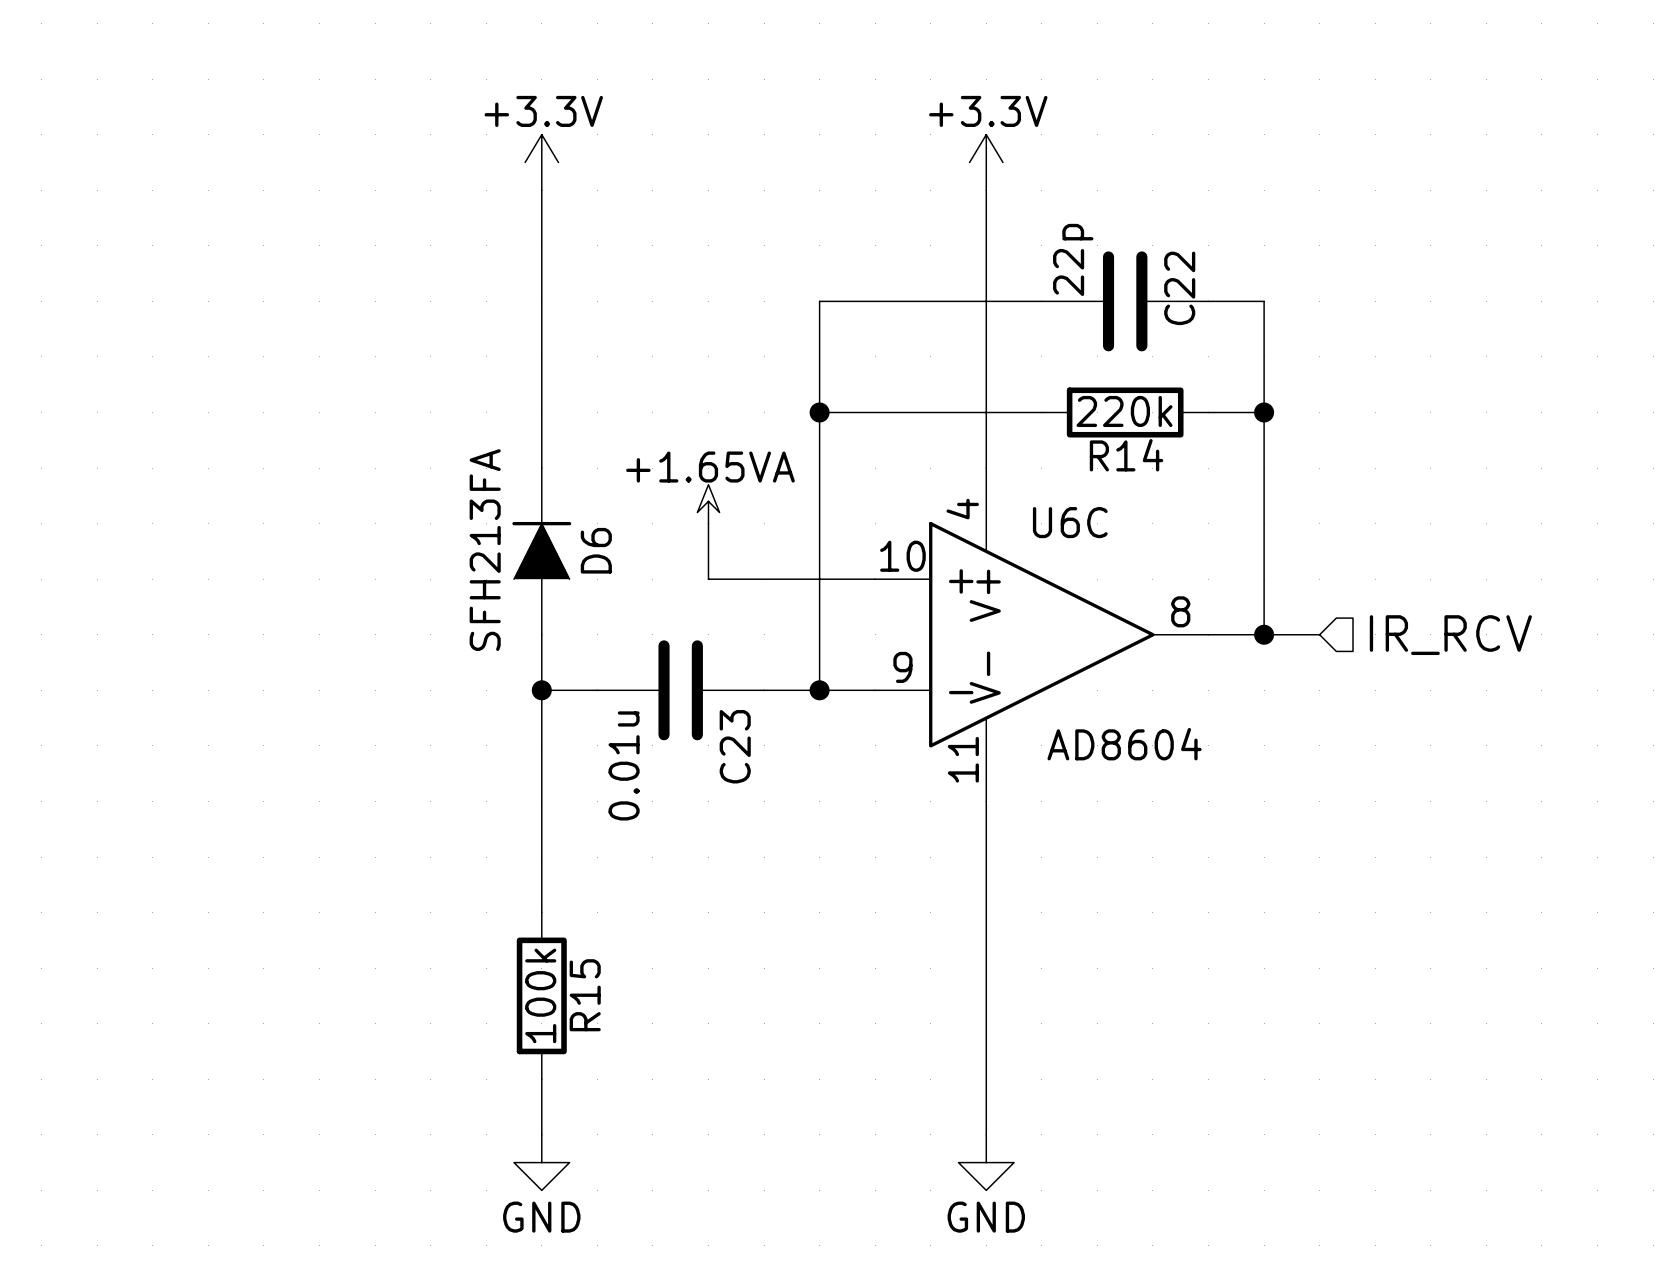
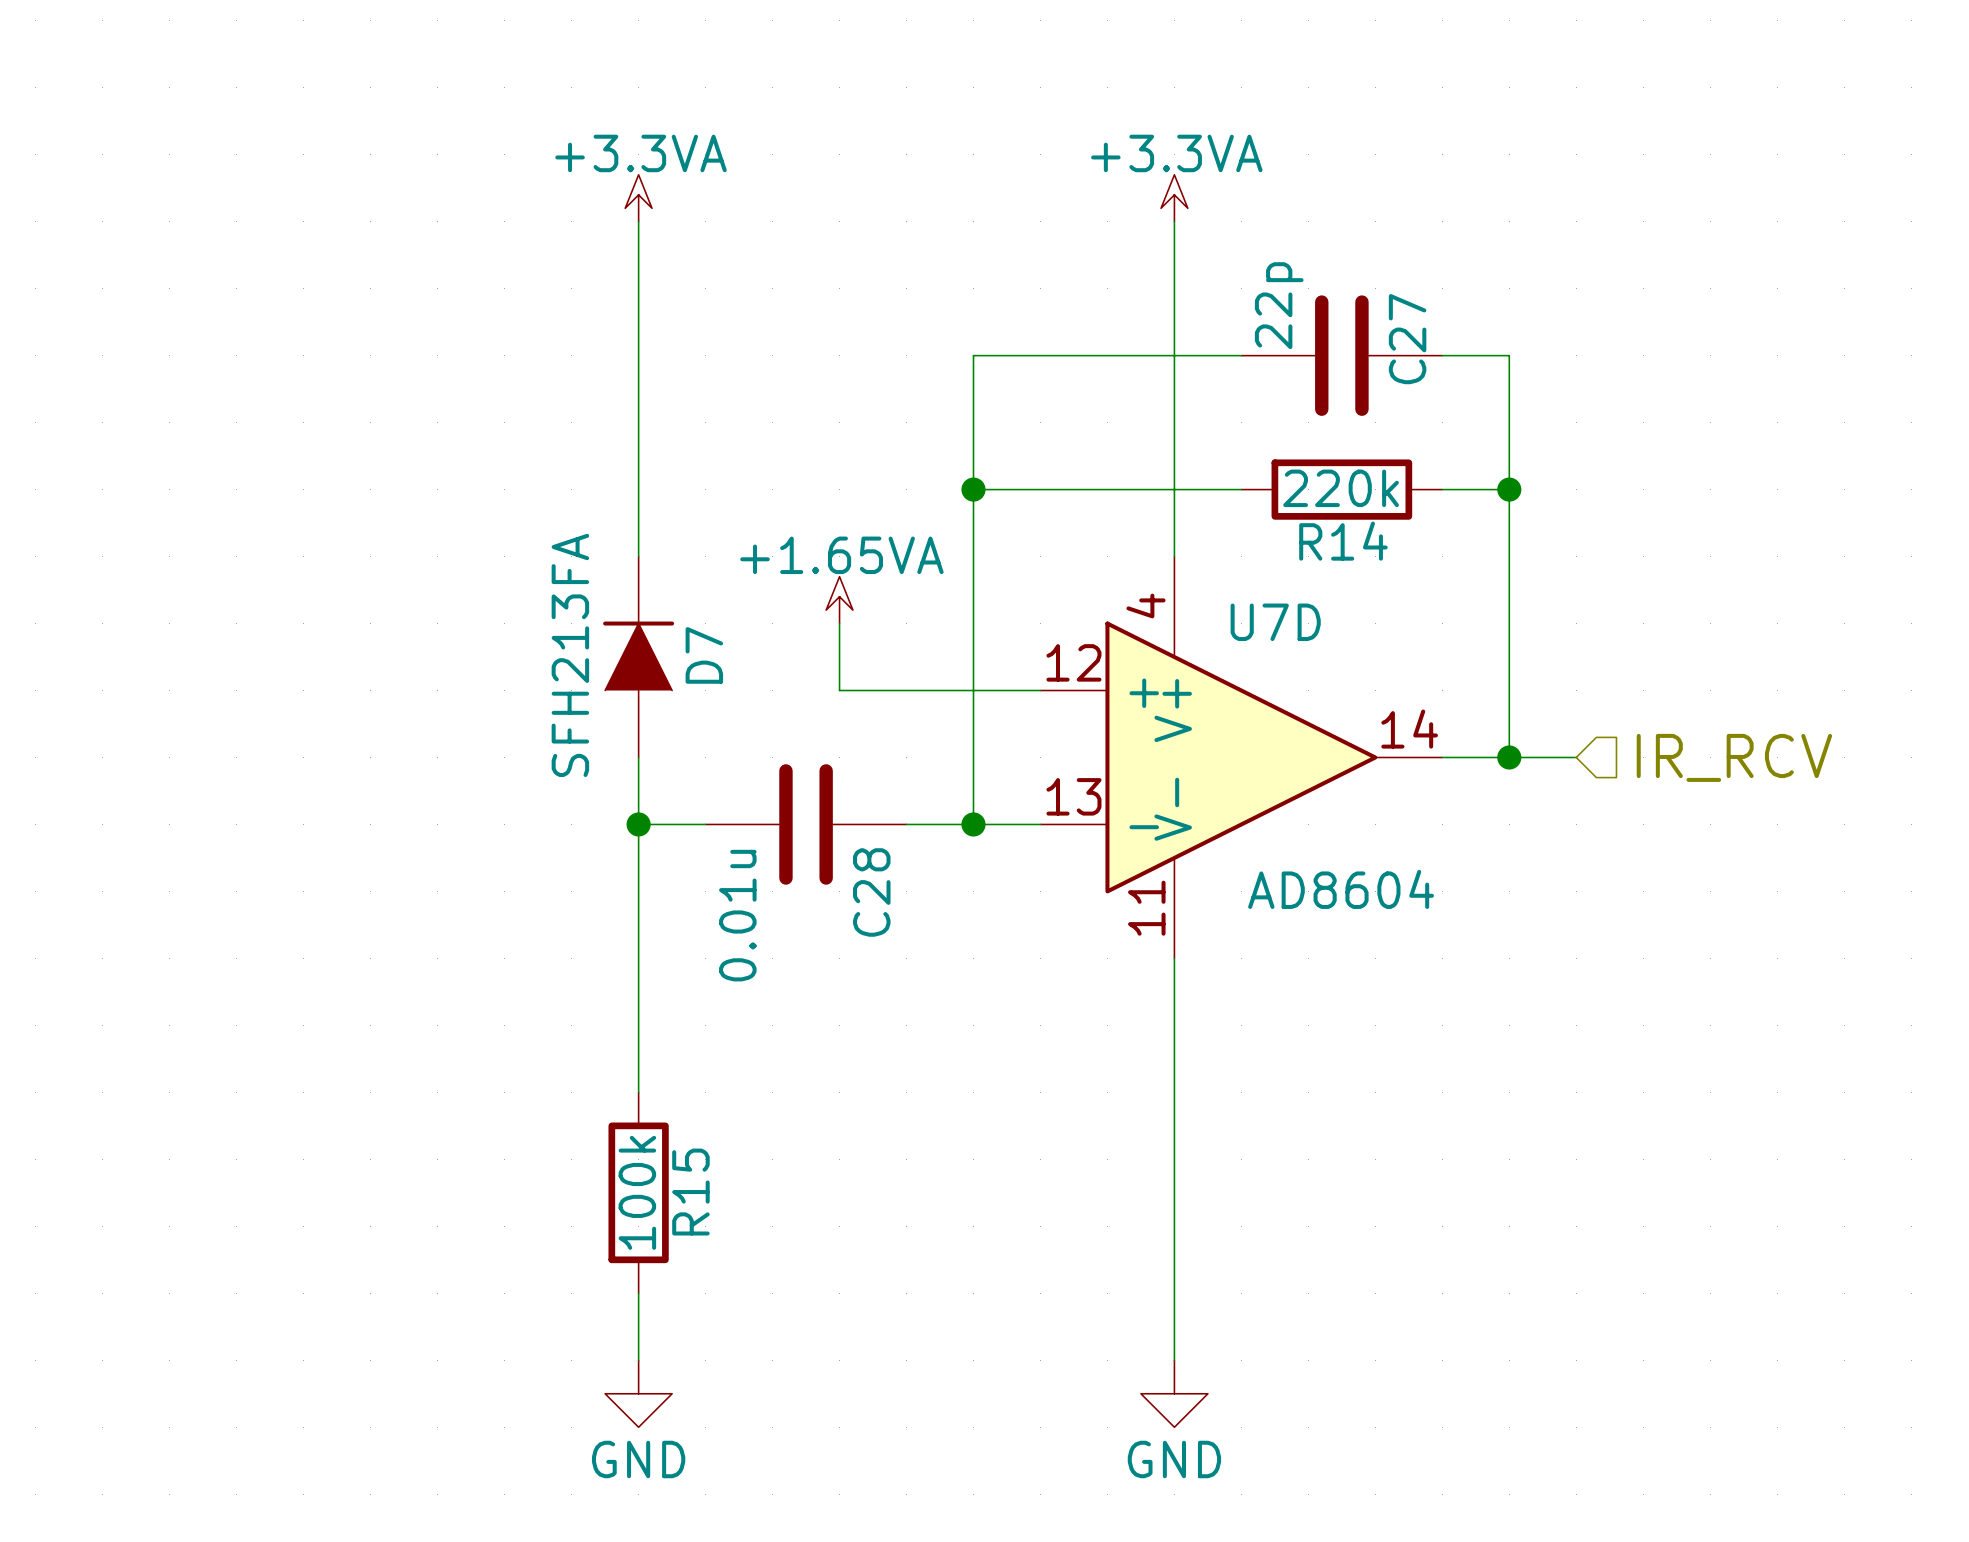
power symbol: +3.3V (541, 162) -> +3.3VA (638, 198)
power symbol: +3.3V (986, 162) -> +3.3VA (1174, 198)
C22 name: C22 (1179, 288) -> C27 (1407, 339)
U6C name: U6C (1070, 522) -> U7D (1275, 622)
D6 name: D6 (596, 550) -> D7 (704, 655)
U6C pin number: 10 (902, 556) -> 12 (1073, 662)
U6C pin number: 8 (1180, 611) -> 14 (1409, 729)
U6C pin number: 9 (902, 667) -> 13 (1073, 796)
C23 name: C23 (735, 746) -> C28 (871, 892)

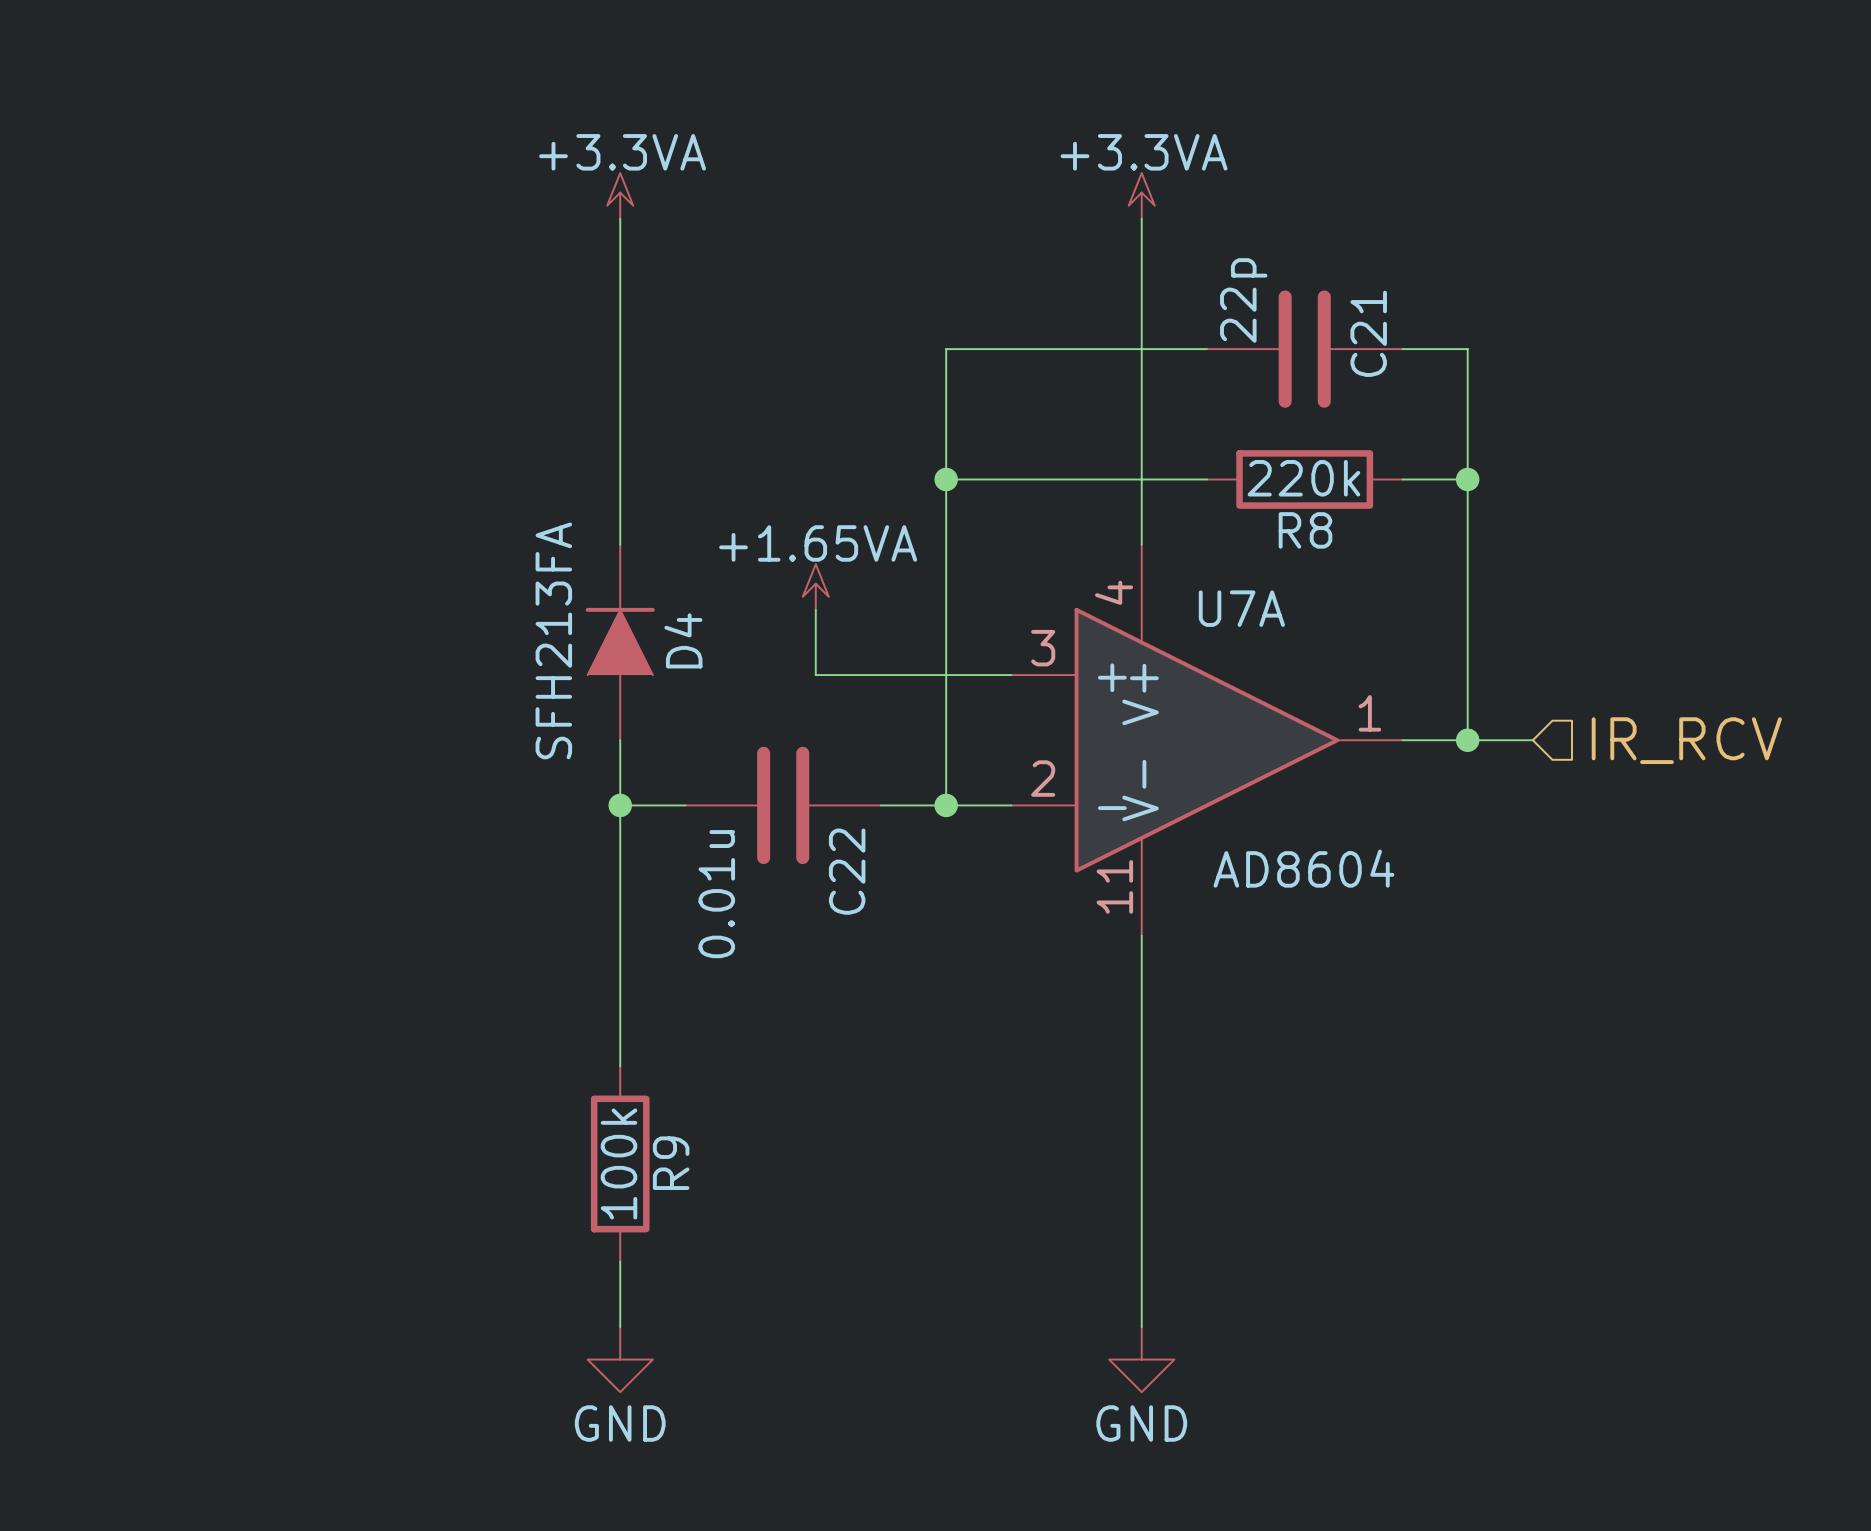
C27 name: C27 (1407, 339) -> C21 (1368, 333)
R14 name: R14 (1343, 541) -> R8 (1305, 530)
U7D name: U7D (1275, 622) -> U7A (1241, 608)
D7 name: D7 (704, 655) -> D4 (683, 640)
U7D pin number: 12 (1073, 662) -> 3 (1043, 648)
U7D pin number: 14 (1409, 729) -> 1 (1369, 713)
U7D pin number: 13 (1073, 796) -> 2 (1043, 778)
C28 name: C28 (871, 892) -> C22 (847, 871)
R15 name: R15 (690, 1192) -> R9 (671, 1163)

